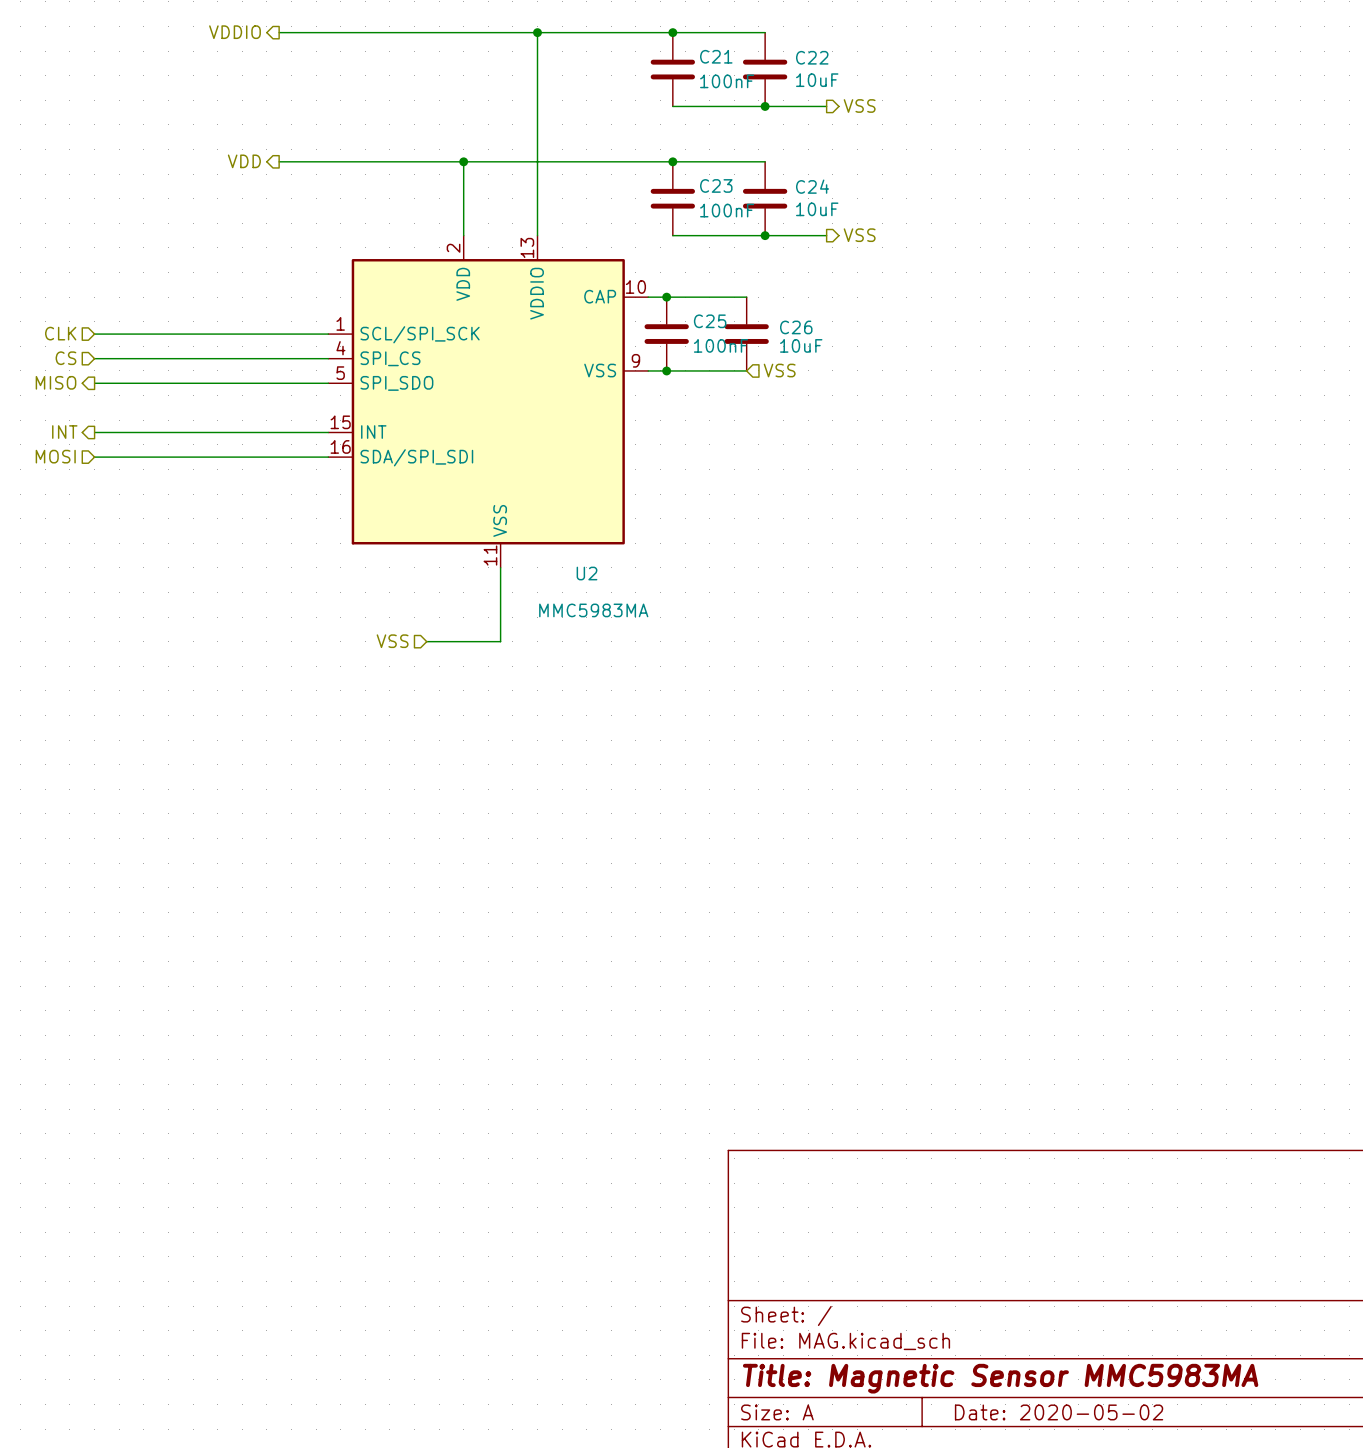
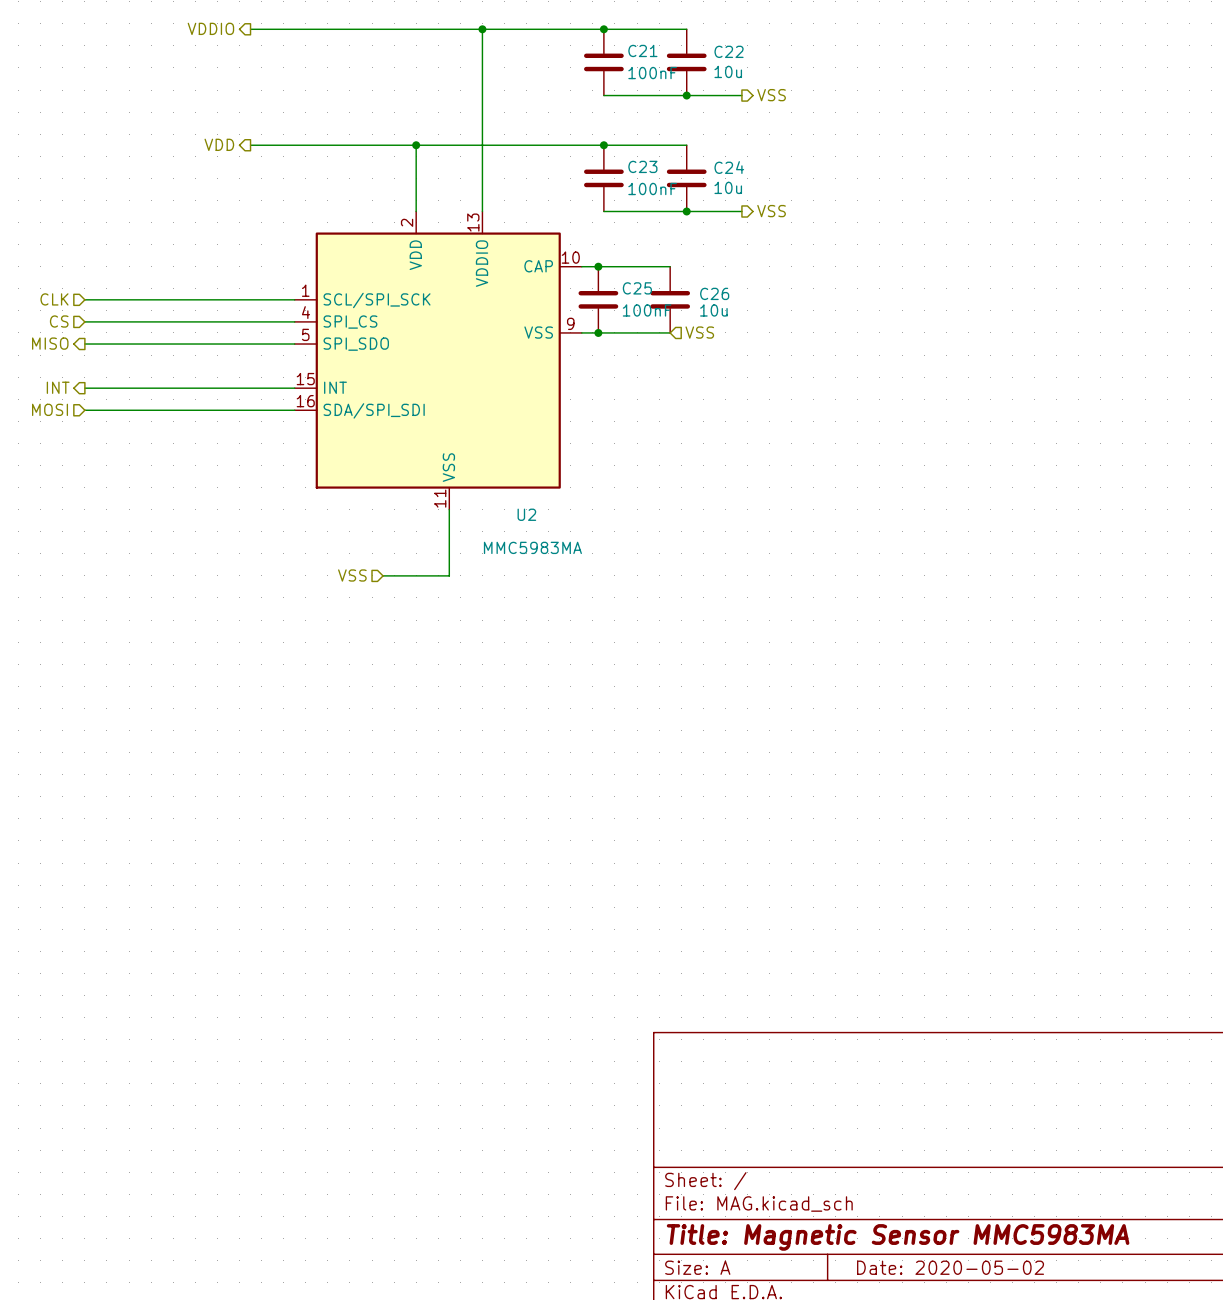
C22 value: 10uF (817, 80) -> 10u (728, 71)
C24 value: 10uF (817, 209) -> 10u (728, 187)
C26 value: 10uF (801, 345) -> 10u (713, 310)

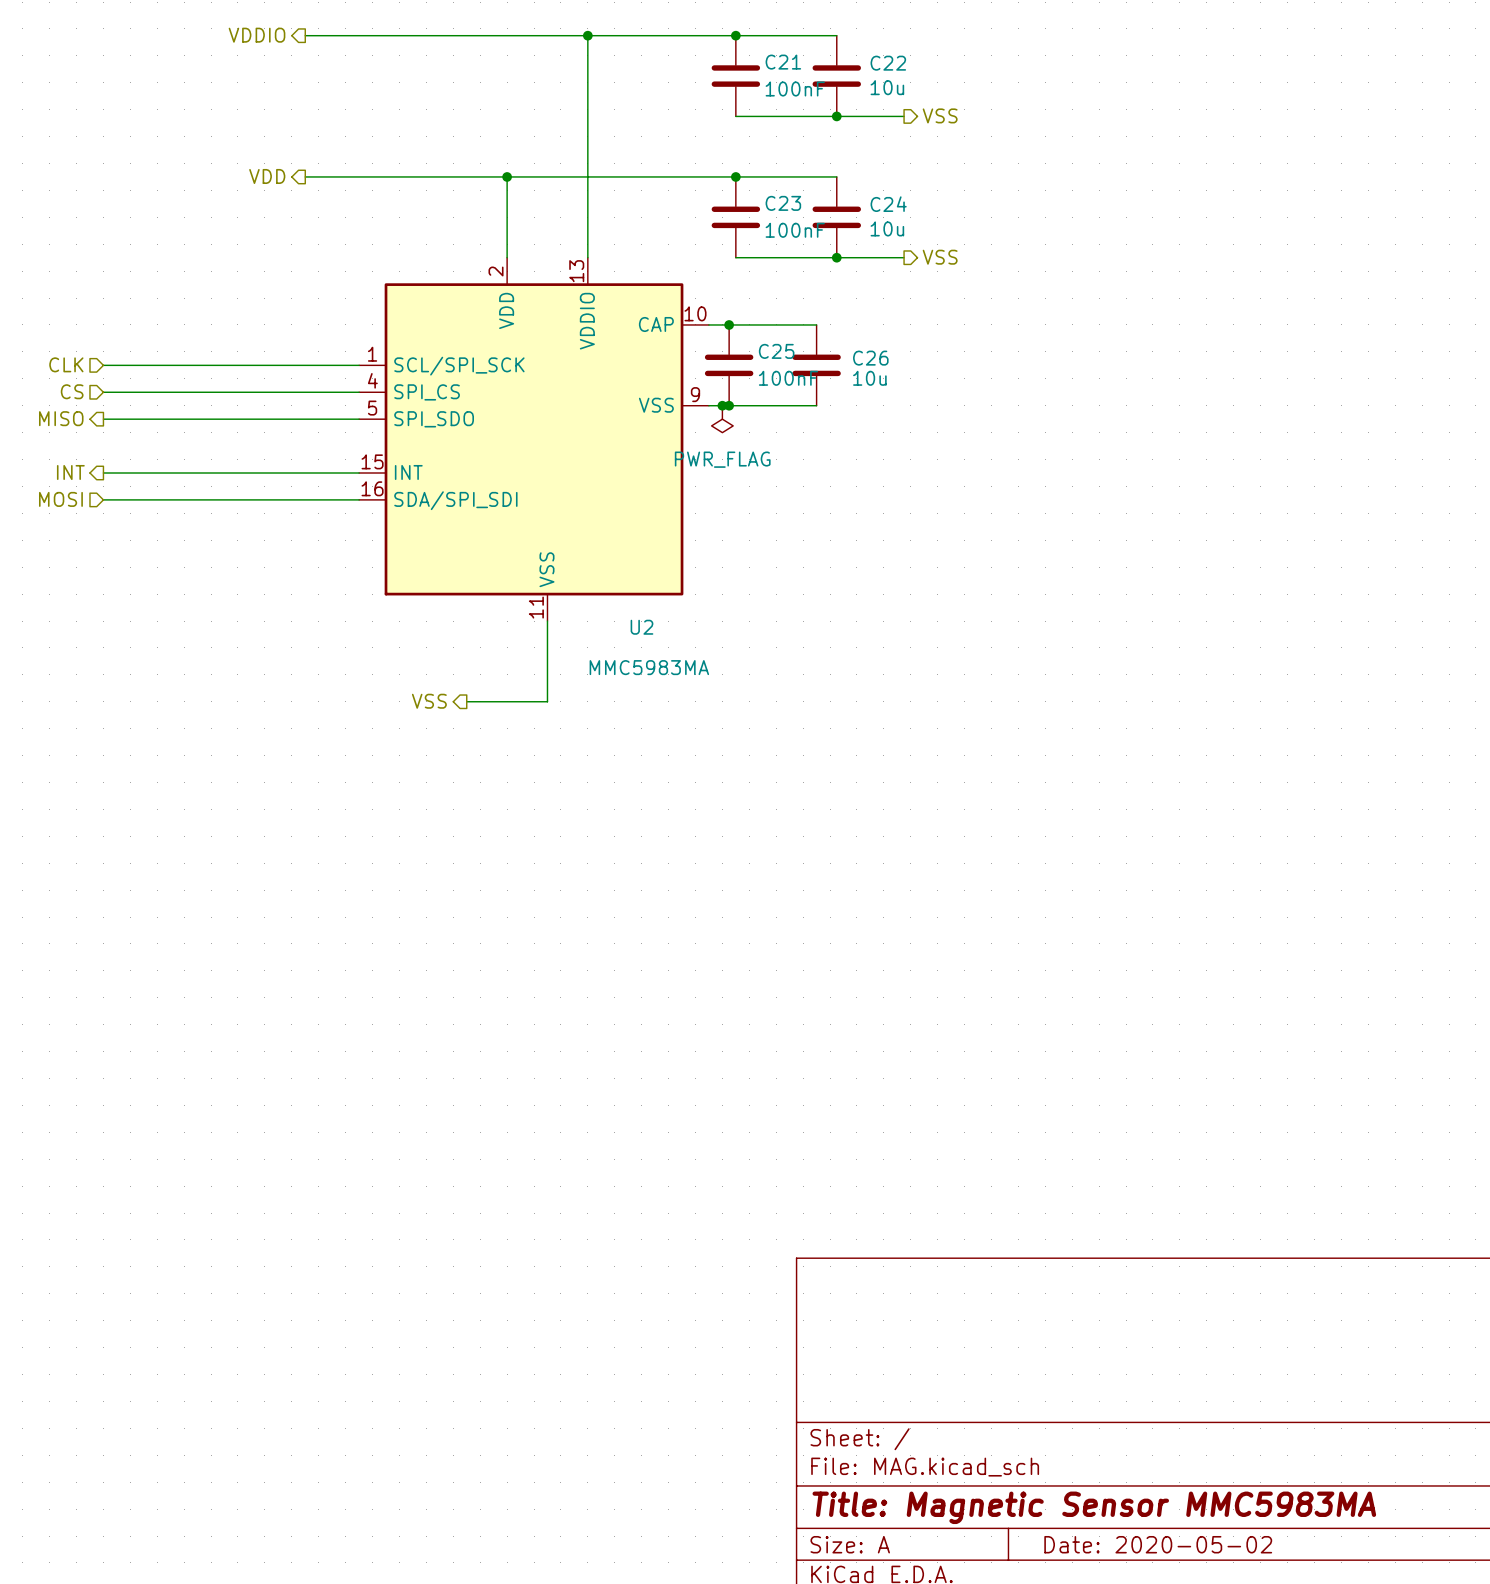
junction: none -> (722, 405)
hierarchical label: VSS (699, 332) -> none
power symbol: none -> PWR_FLAG (722, 419)
hierarchical label shape: input (352, 575) -> output (429, 701)

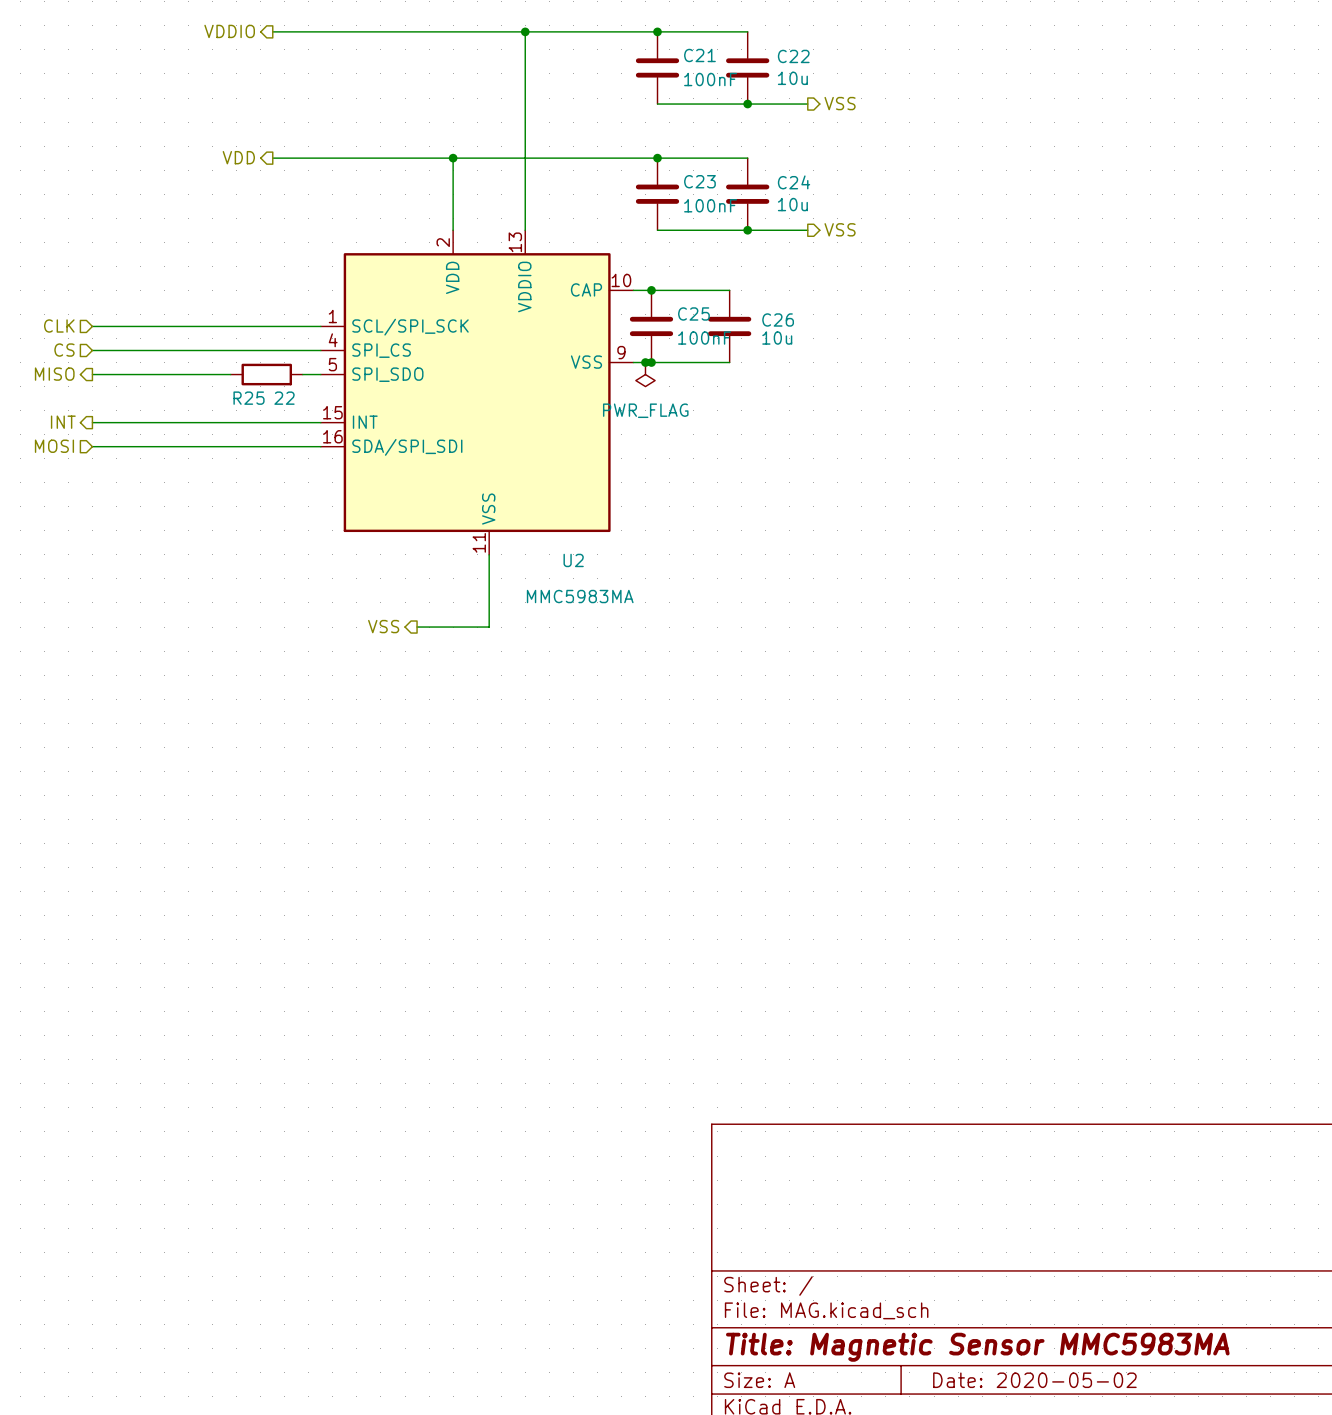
wire: (258, 419) (338, 419) -> none
R25: none -> 22 (266, 374)

